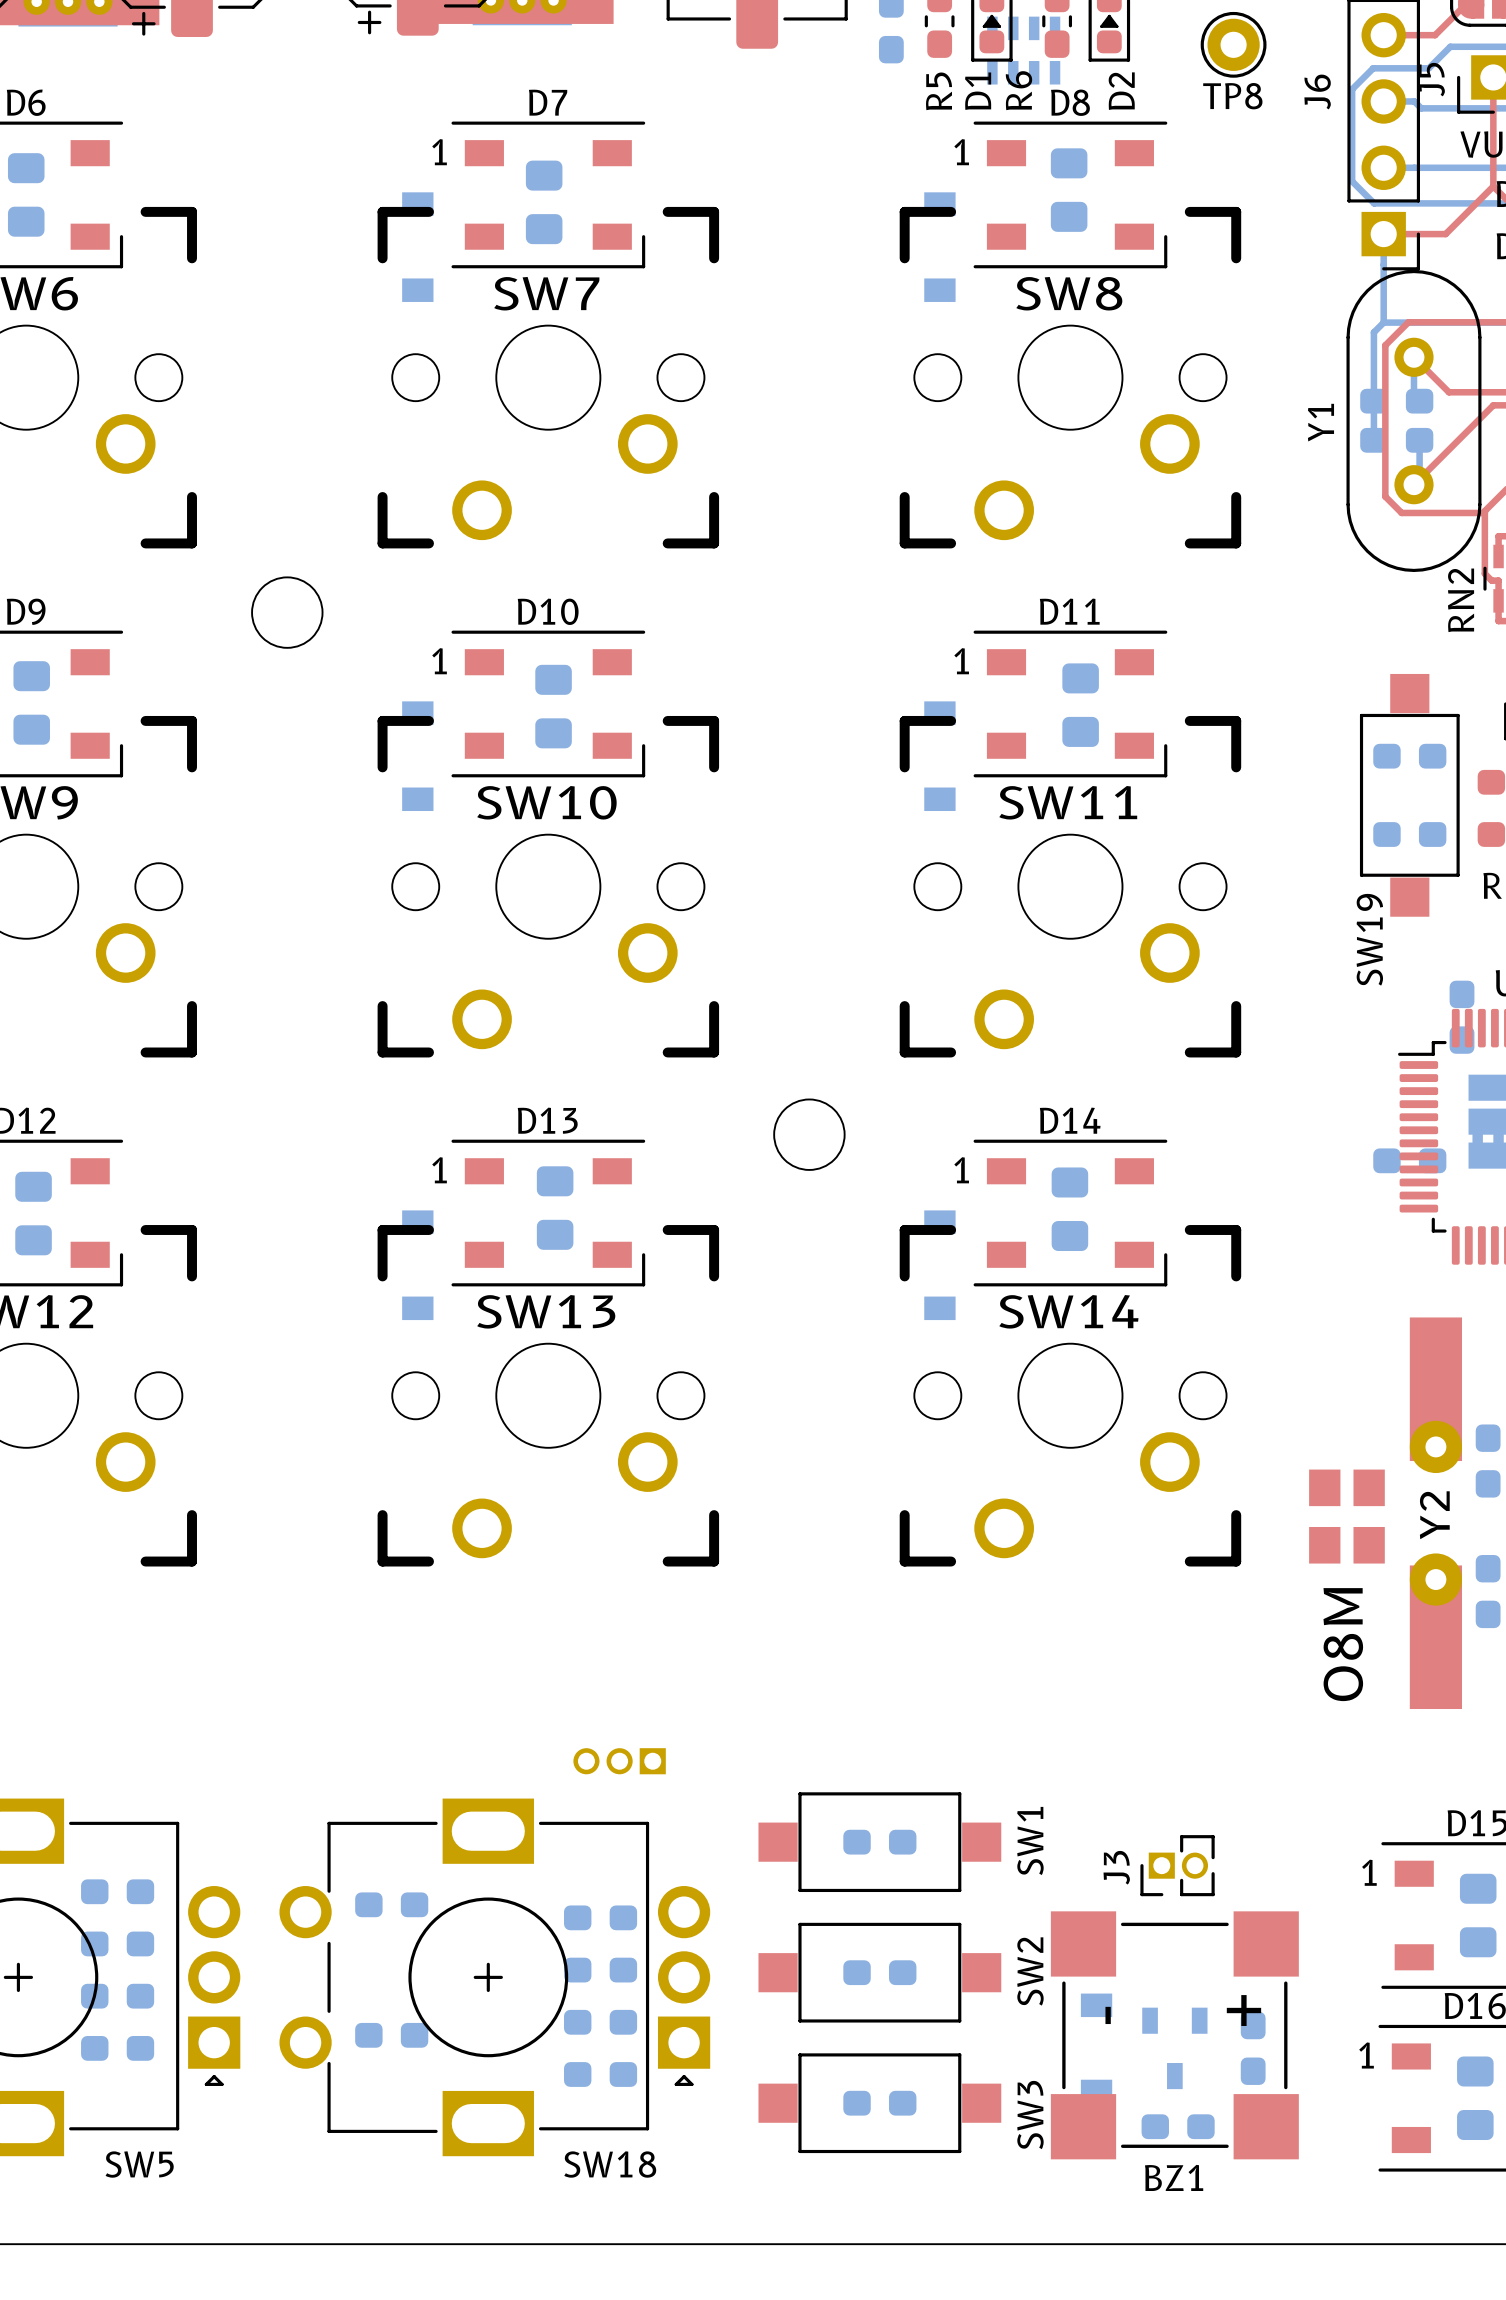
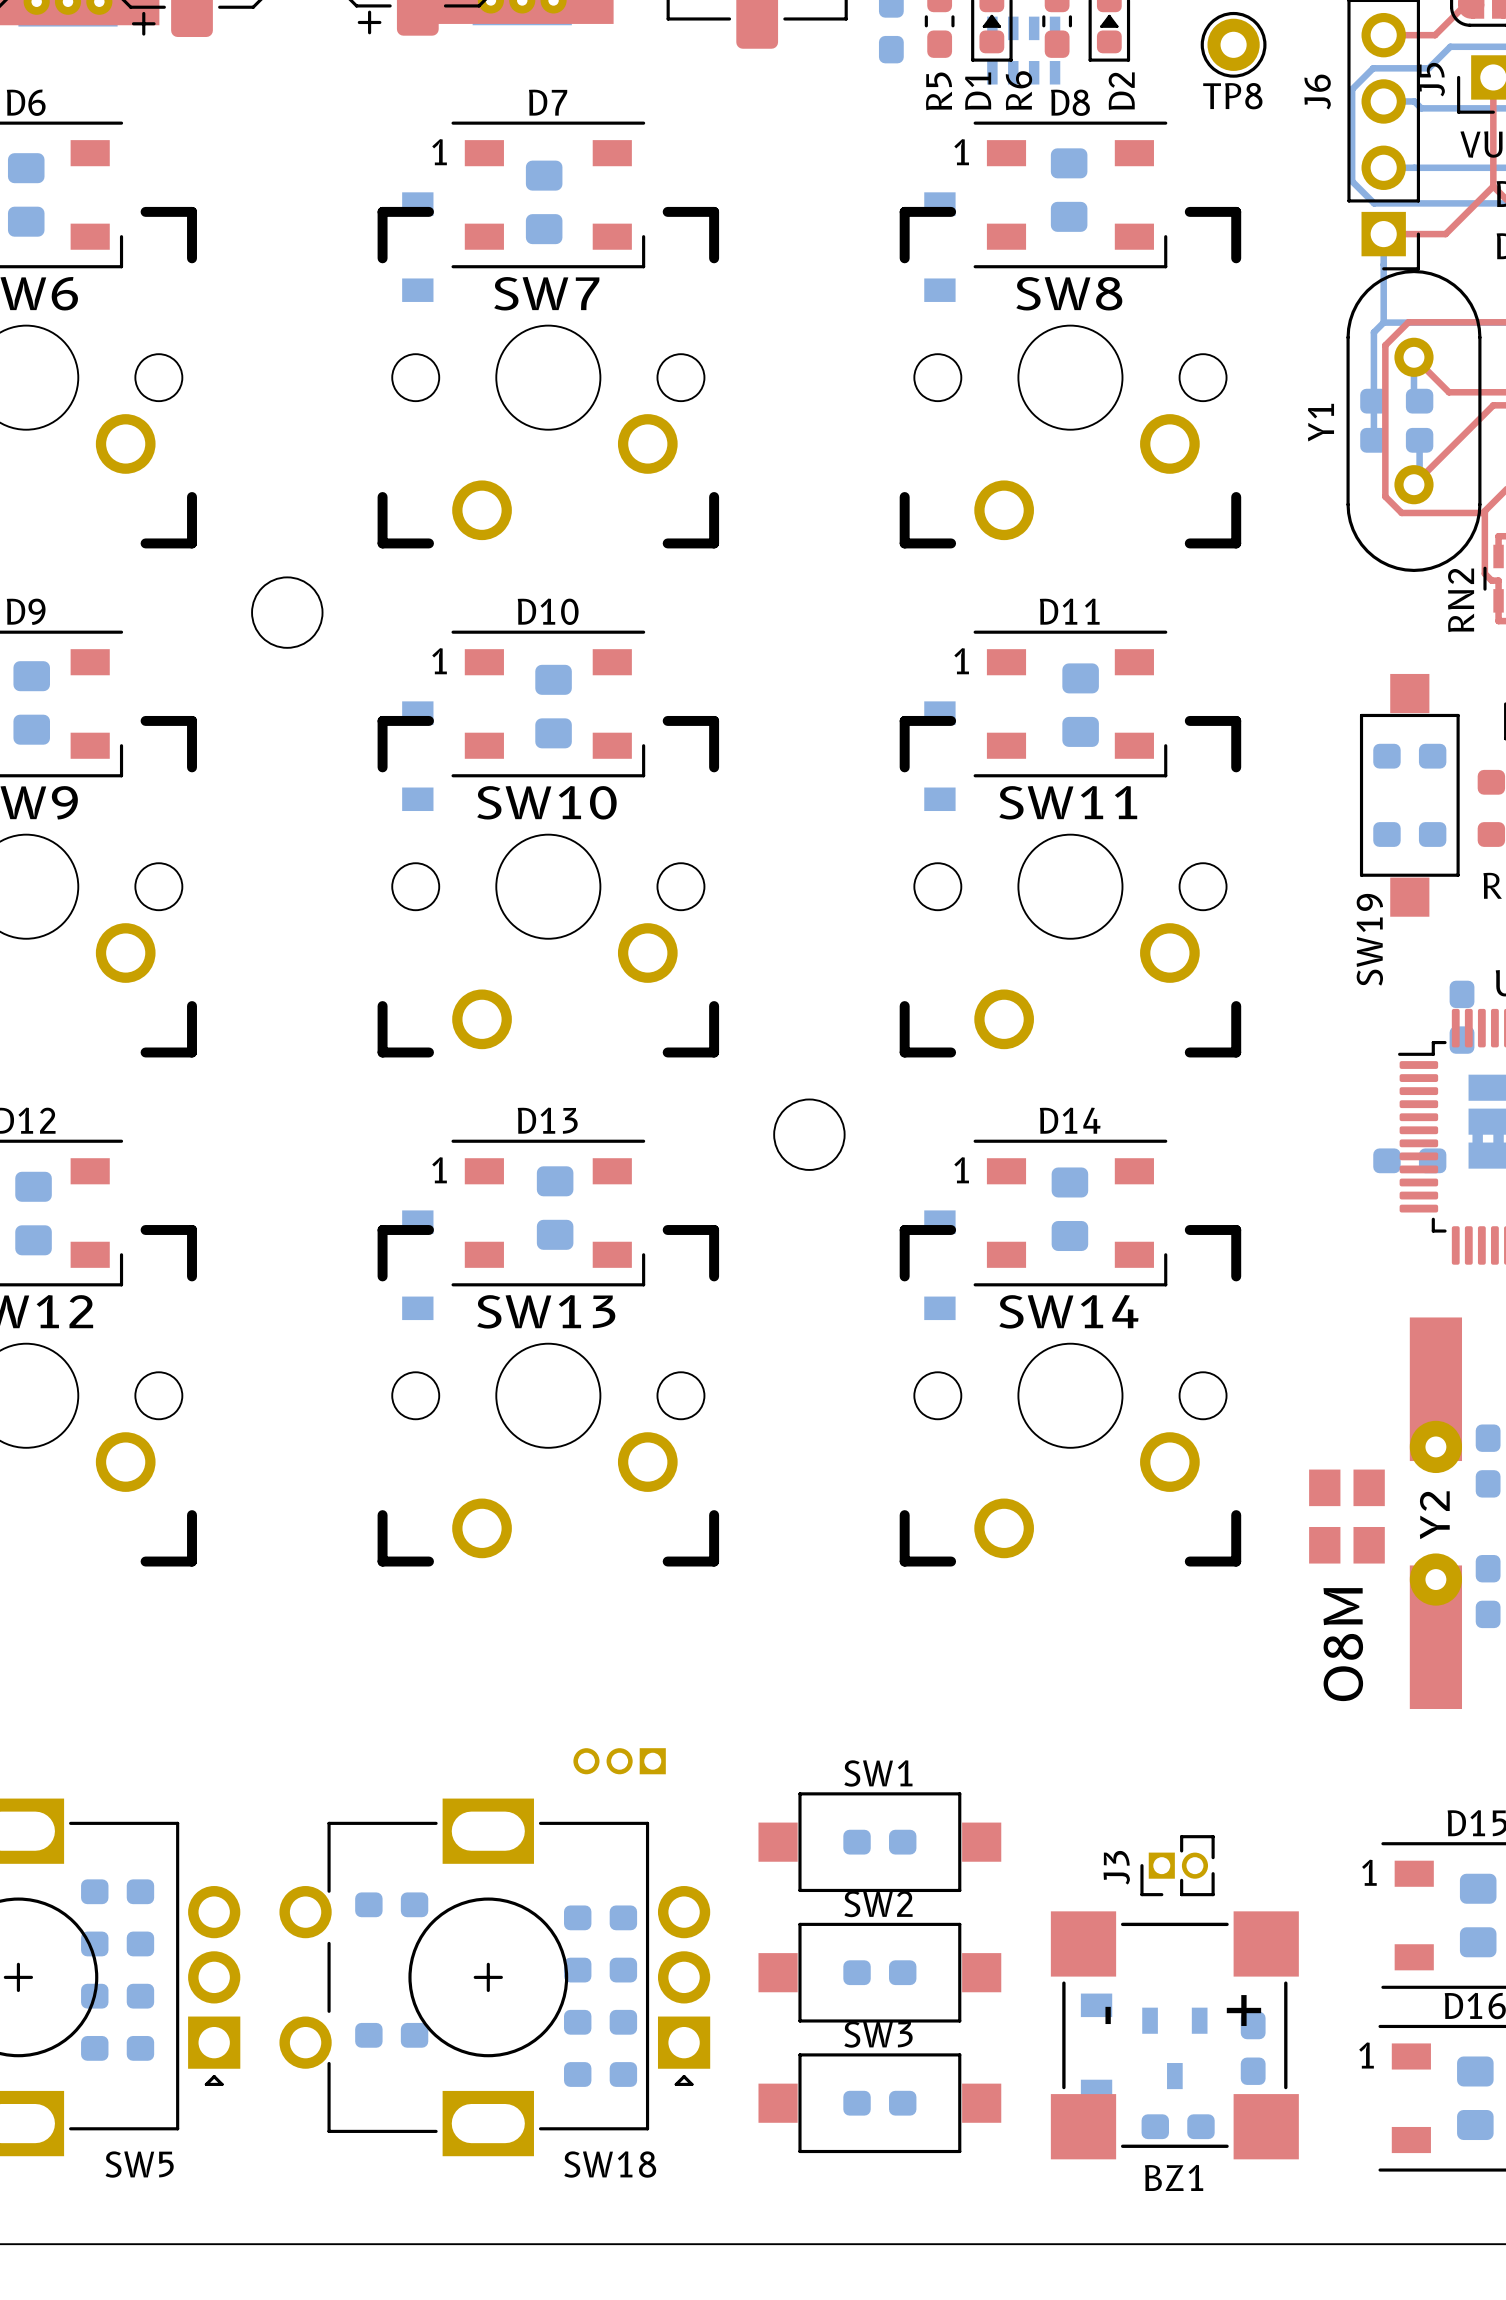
SW1 name rotation: 0° (1030, 1840) -> 90° clockwise (878, 1773)
SW1 name position: SW1 (1030, 1840) -> SW1 (878, 1773)
SW2 name rotation: 0° (1030, 1971) -> 90° clockwise (878, 1903)
SW2 name position: SW2 (1030, 1971) -> SW2 (878, 1903)
SW3 name rotation: 0° (1030, 2115) -> 90° clockwise (878, 2034)
SW3 name position: SW3 (1030, 2115) -> SW3 (878, 2034)

